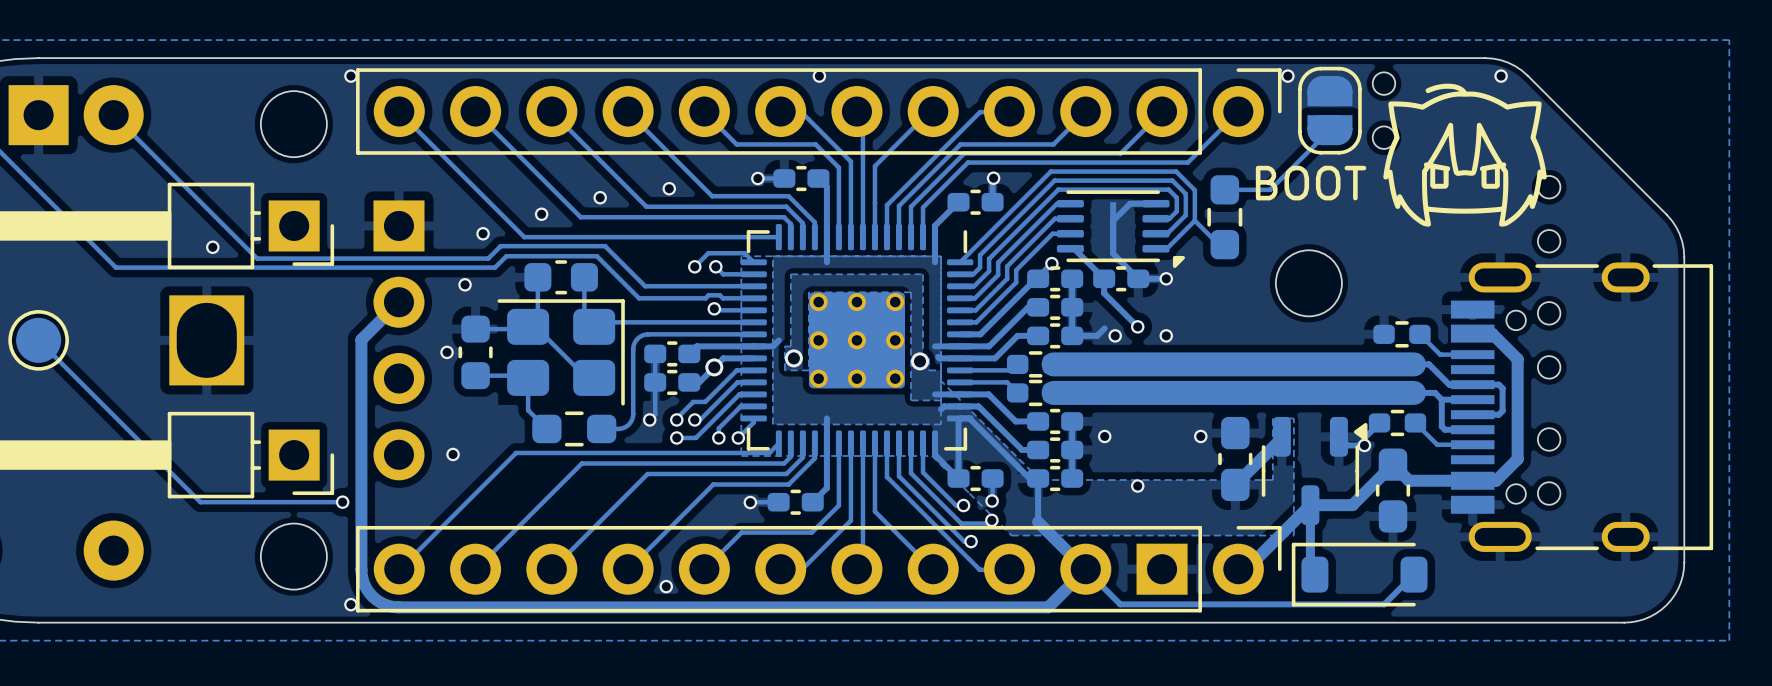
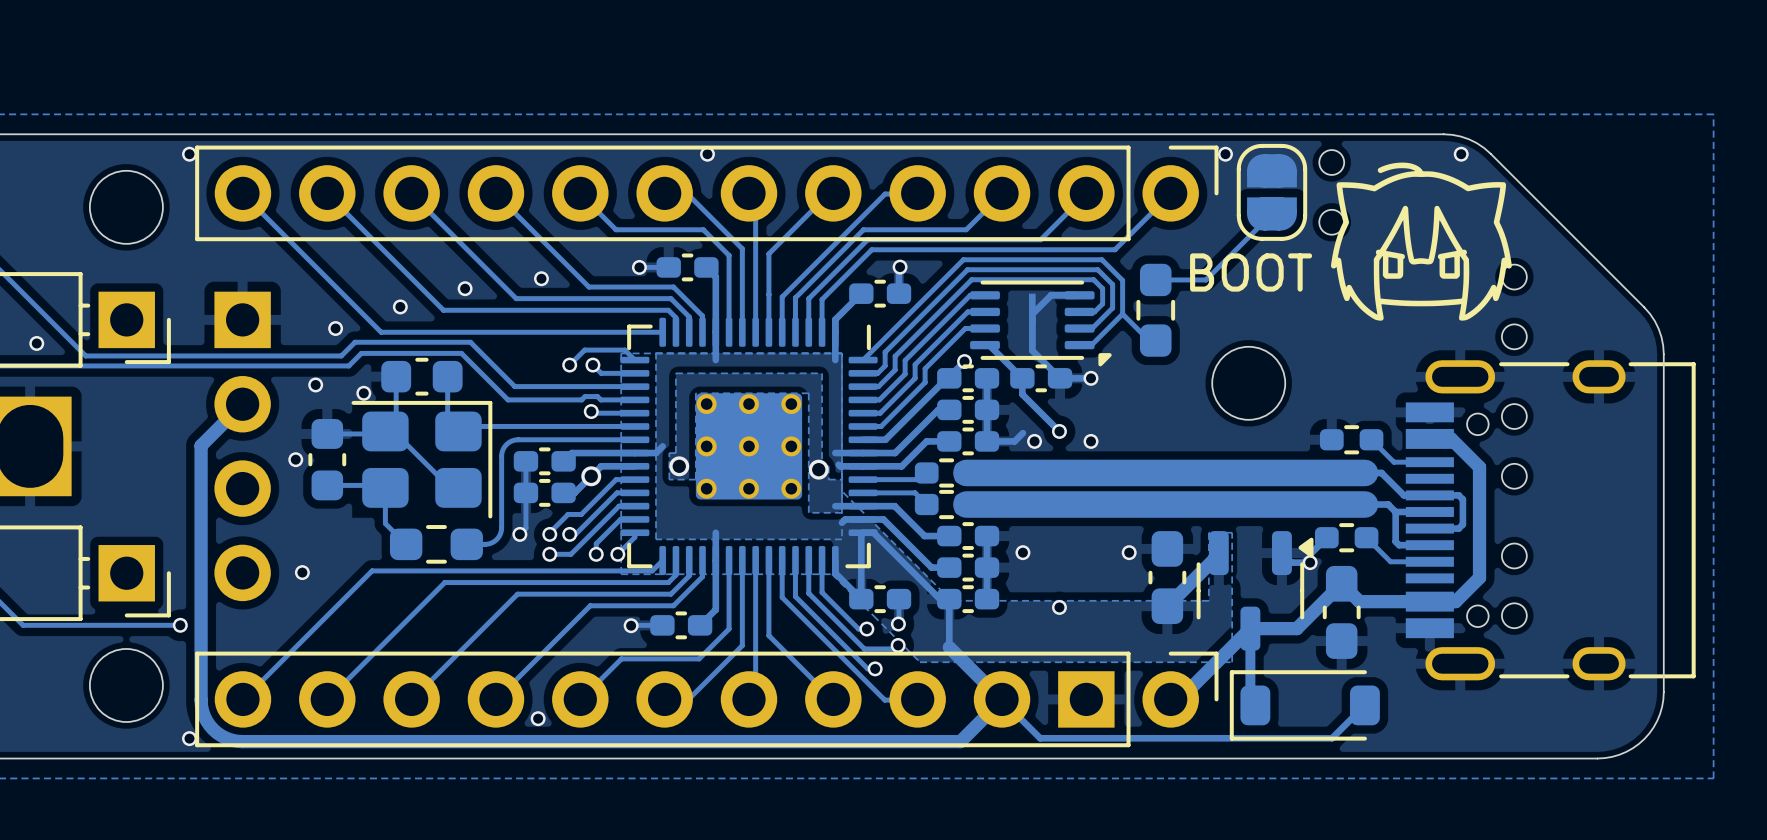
via: none -> (363, 393)

